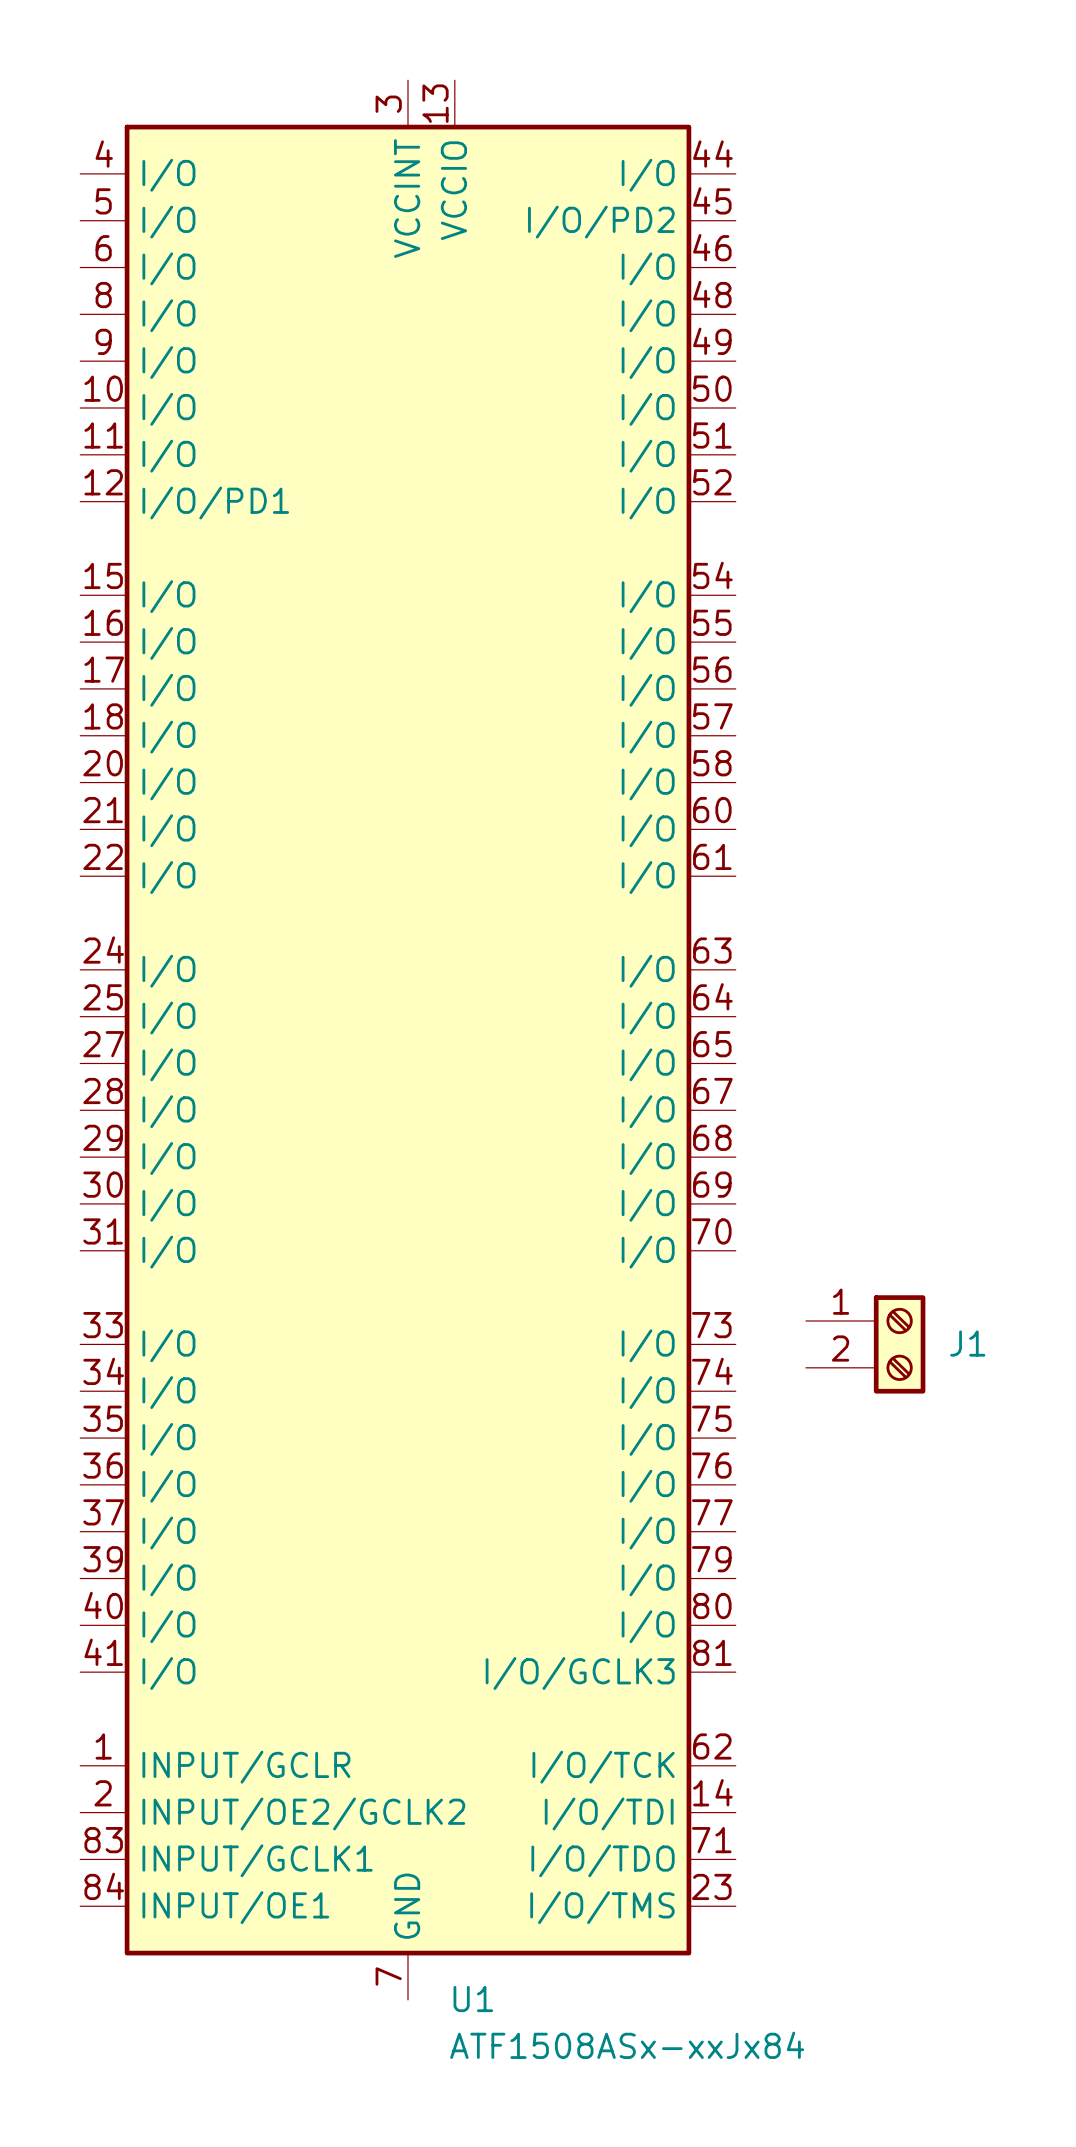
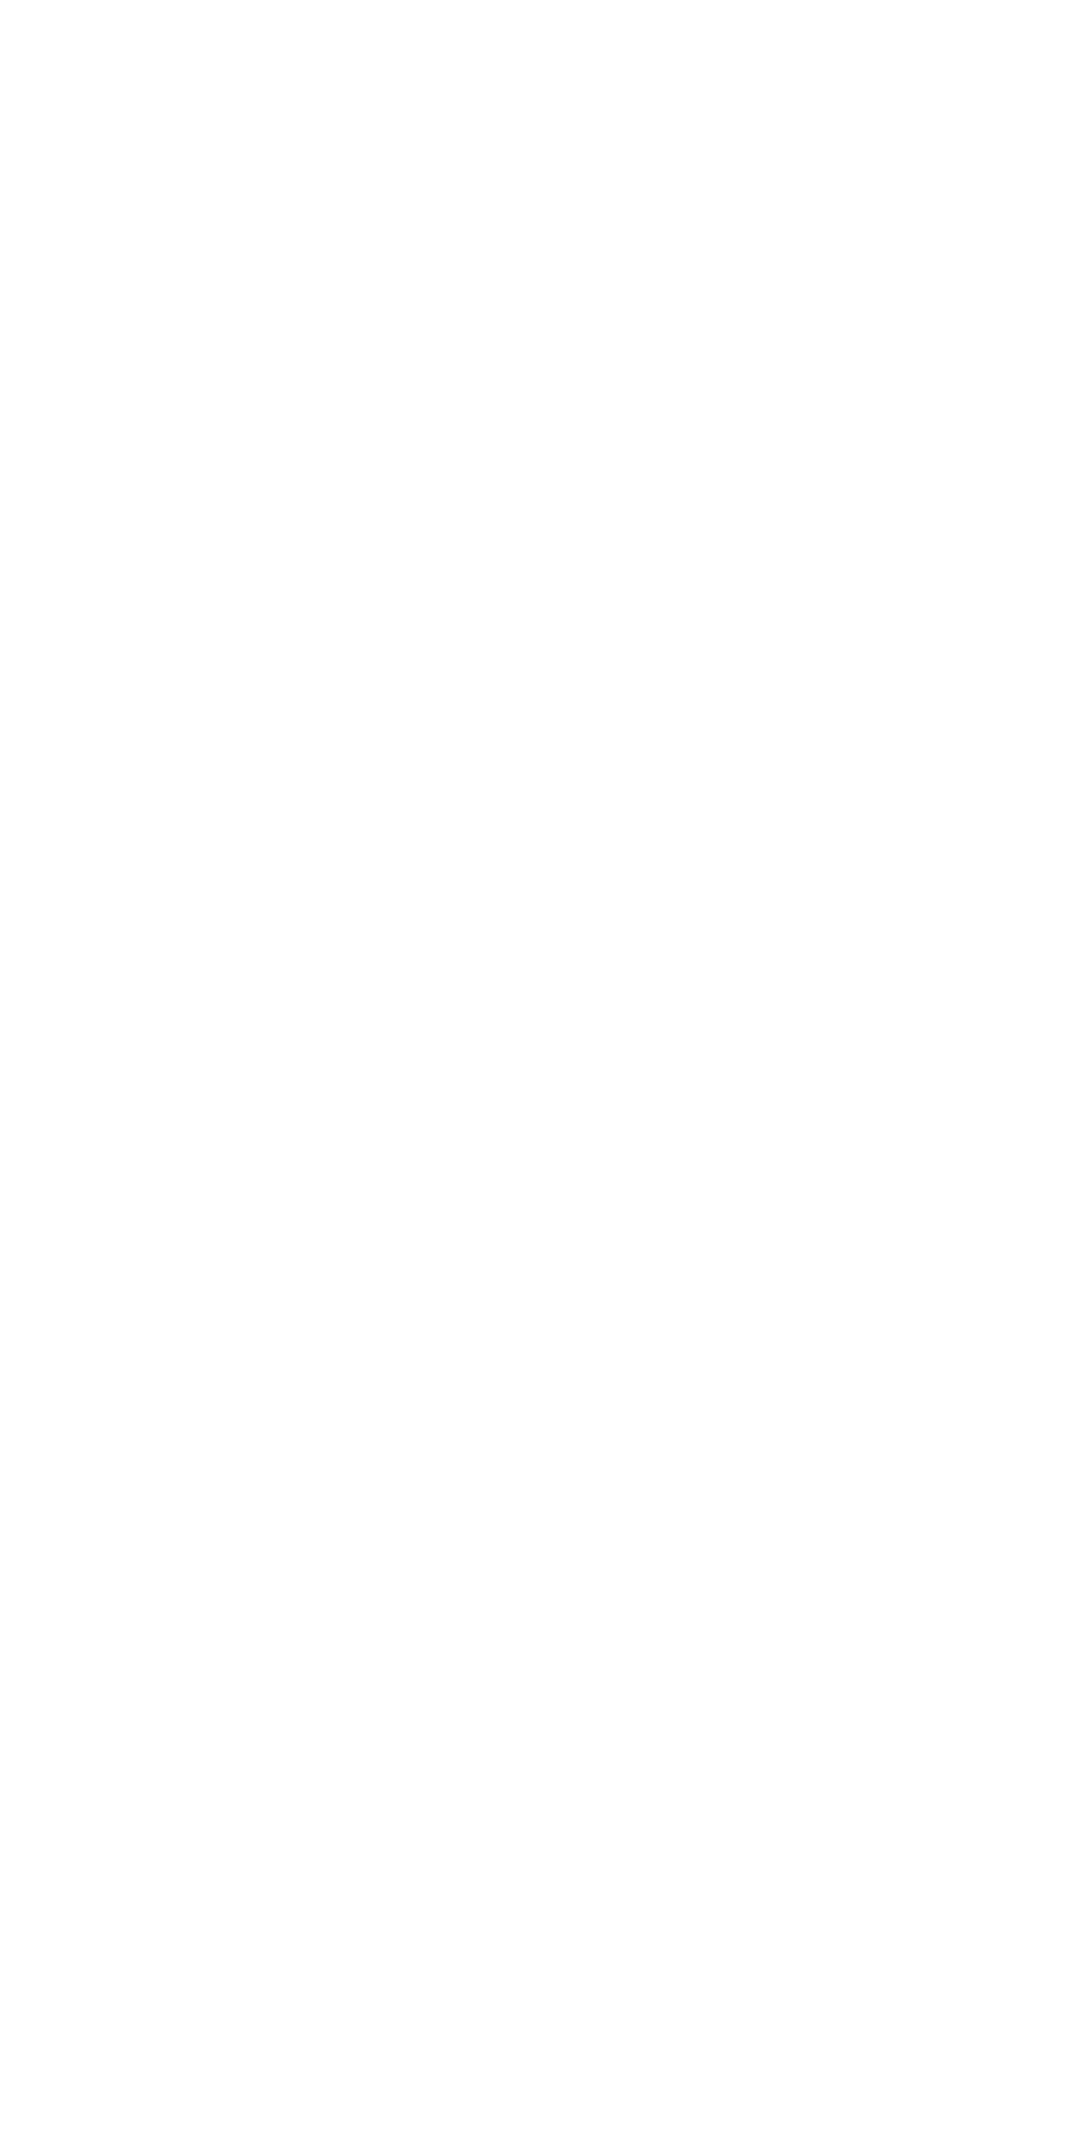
U1: ATF1508ASx-xxJx84 (407, 1040) -> none
J1: (865, 1344) -> none

